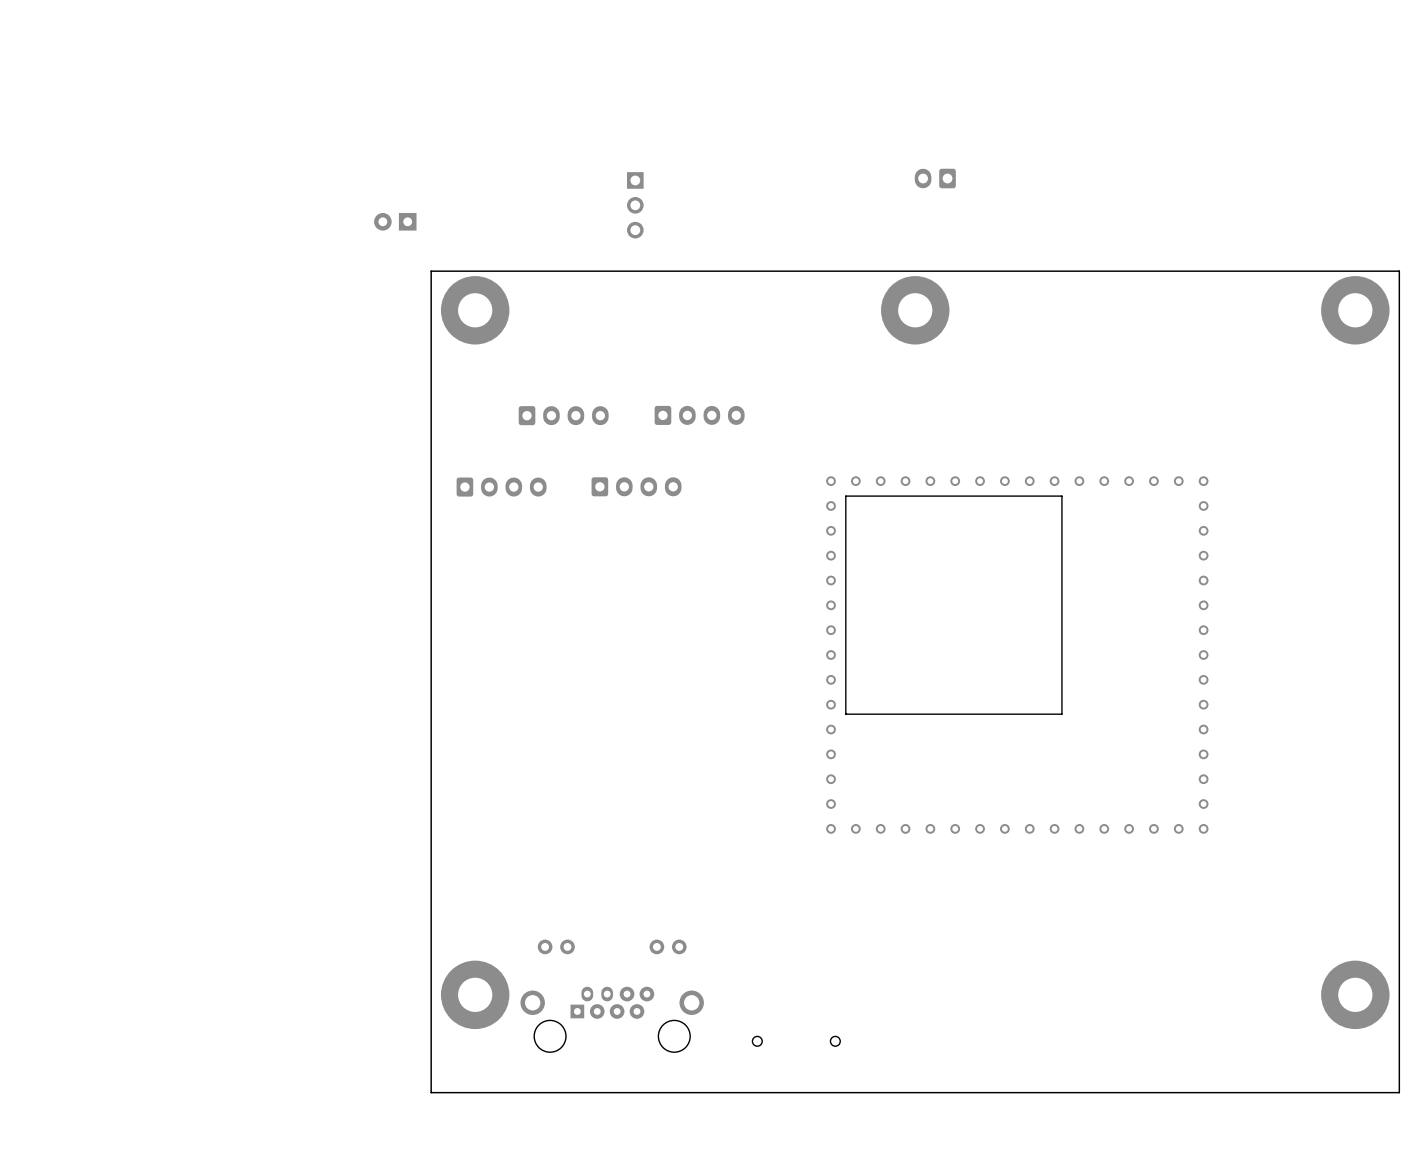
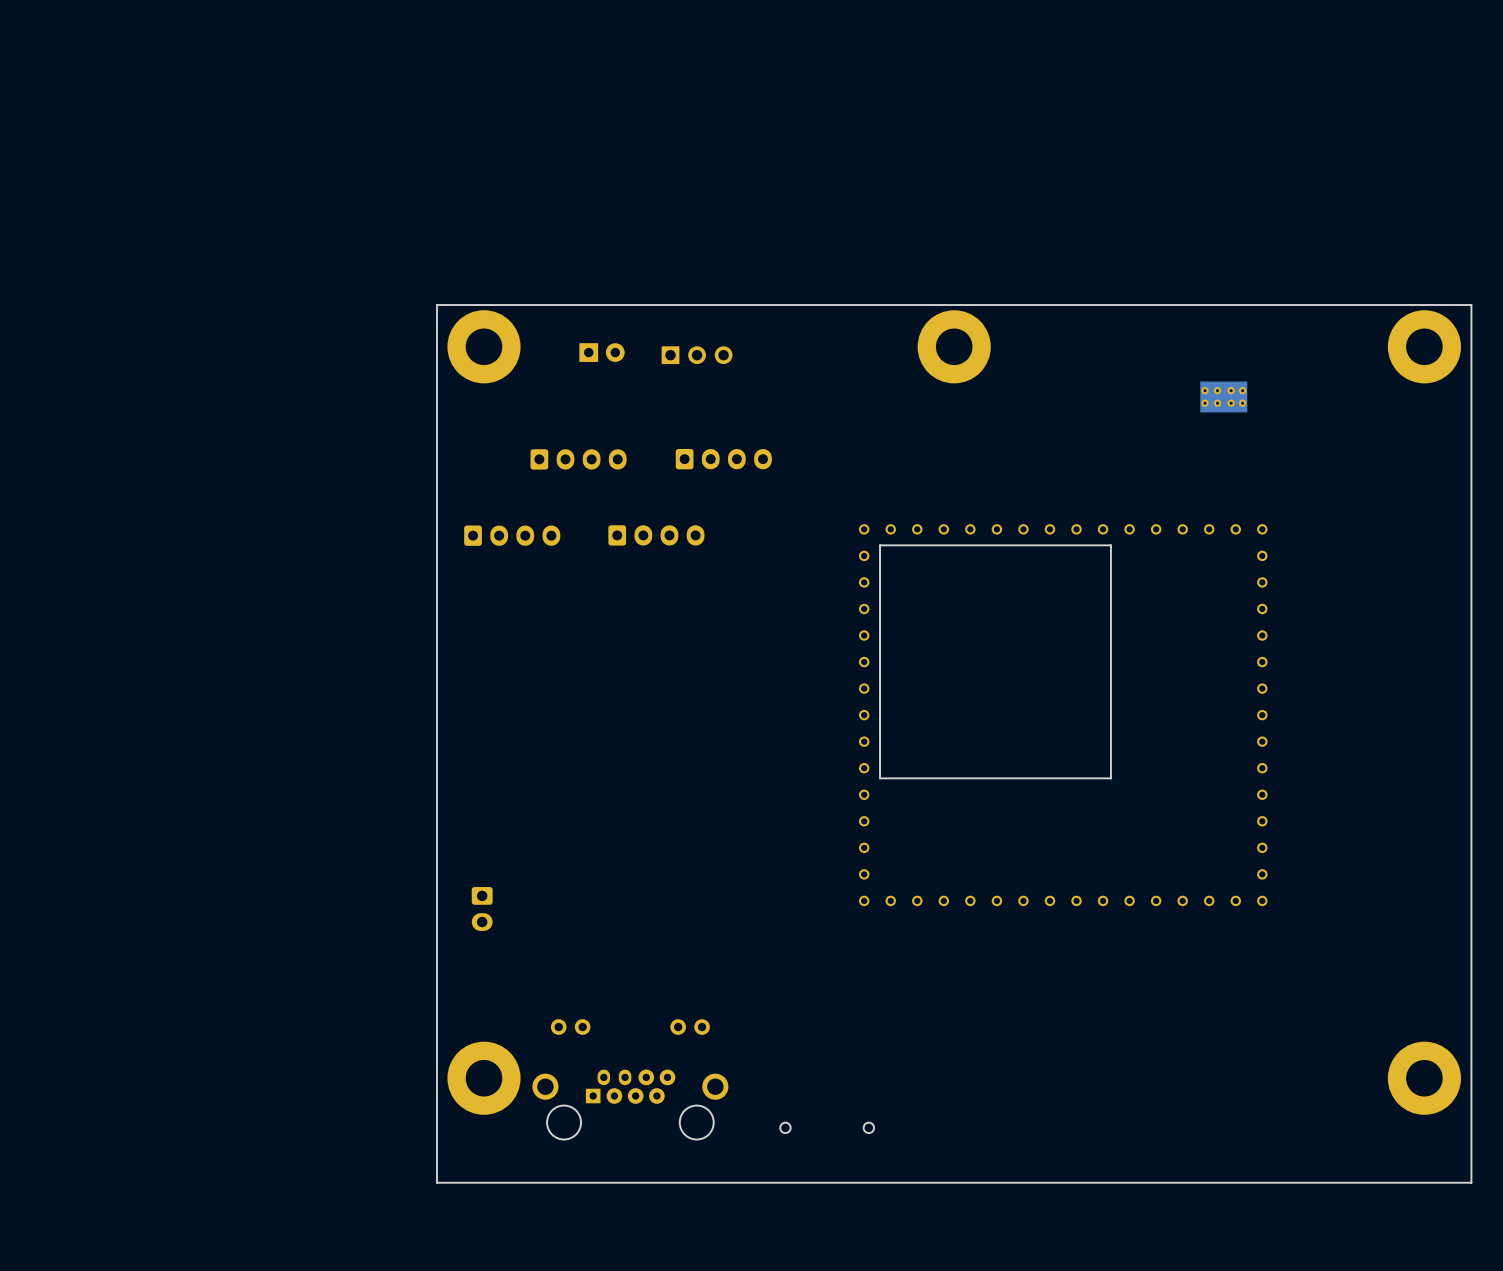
part: (935, 178) -> none
part rotation: 0° (635, 205) -> 90° counterclockwise (697, 355)
part position: (635, 205) -> (697, 355)
part rotation: 0° (395, 221) -> 180° (602, 352)
part position: (395, 221) -> (602, 352)
part: none -> (1223, 396)
part: none -> (482, 908)

